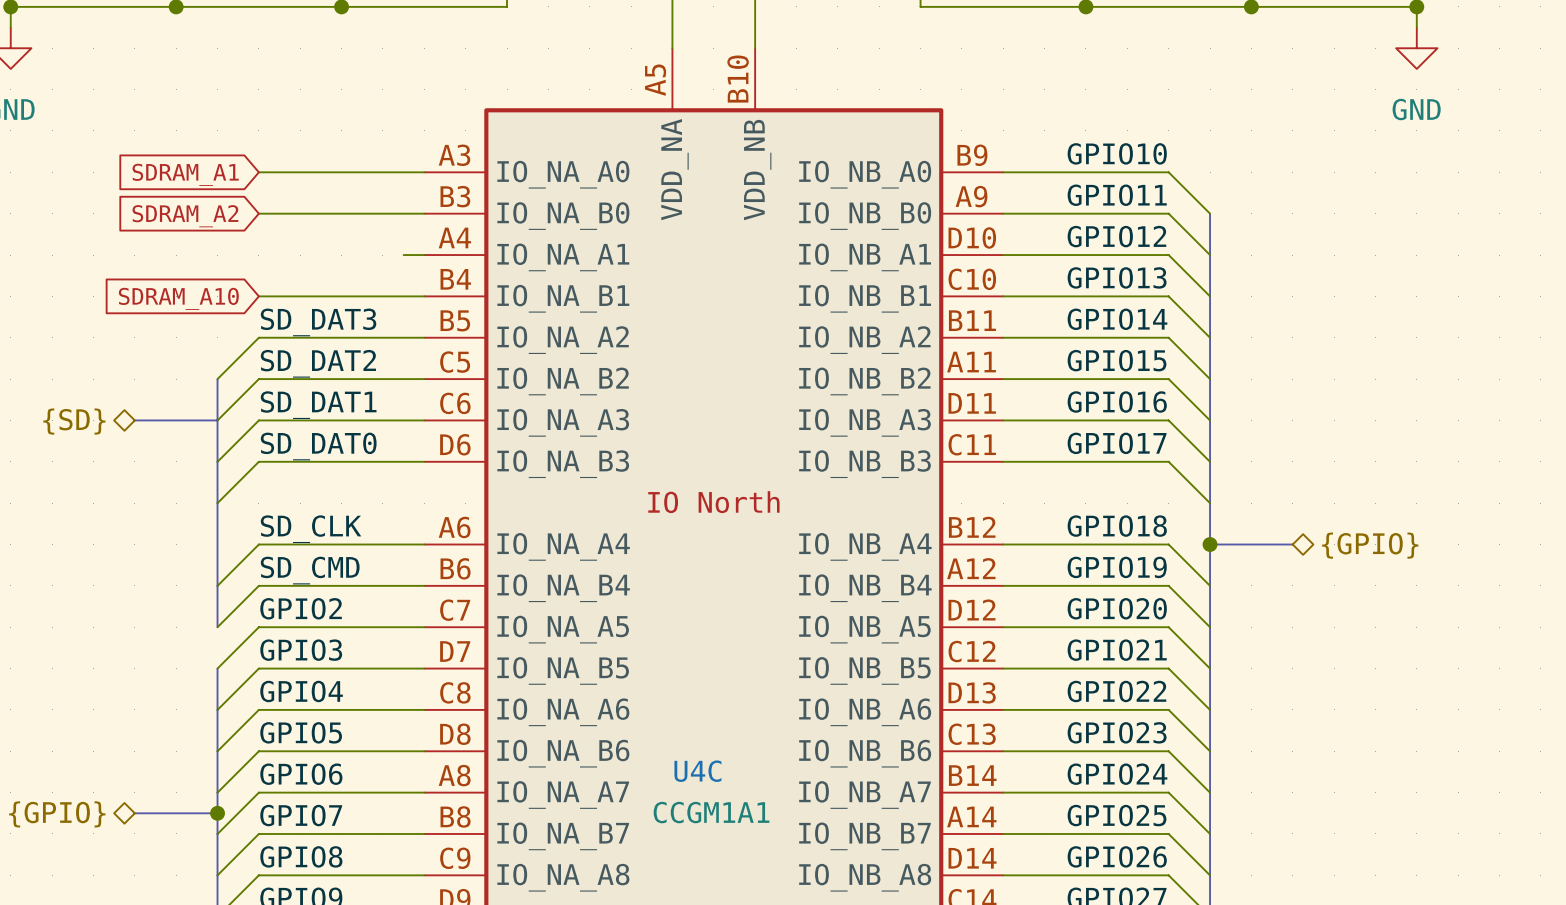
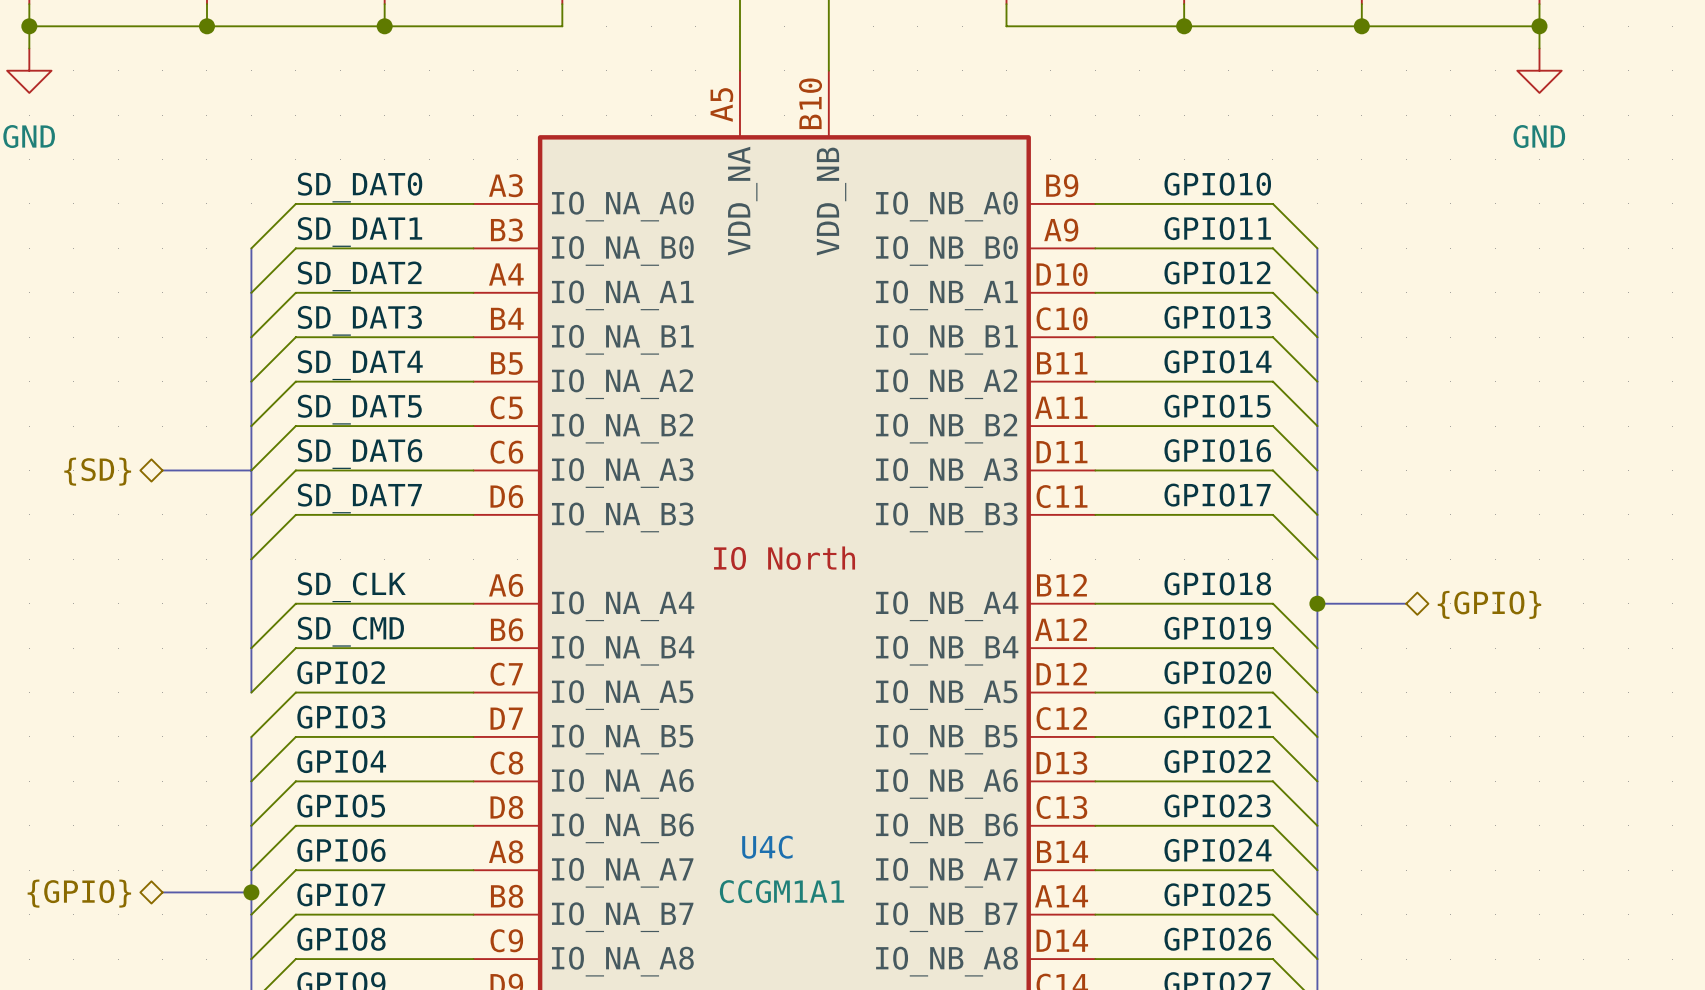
label: none -> SD_DAT0 (360, 187)
wire: none -> (295, 203) (251, 248)
global label: SDRAM_A1 (185, 174) -> none
label: none -> SD_DAT1 (360, 231)
bus: none -> (251, 248) (251, 426)
wire: none -> (295, 248) (251, 292)
global label: SDRAM_A2 (185, 216) -> none
label: none -> SD_DAT2 (359, 276)
wire: none -> (451, 292) (295, 292) (251, 337)
label: none -> SD_DAT3 (359, 320)
wire: none -> (295, 337) (251, 381)
global label: SDRAM_A10 (178, 298) -> none
label: SD_DAT3 (318, 322) -> SD_DAT4 (360, 365)
label: SD_DAT2 (318, 363) -> SD_DAT5 (359, 409)
label: SD_DAT1 (318, 405) -> SD_DAT6 (360, 454)
label: SD_DAT0 (318, 446) -> SD_DAT7 (359, 498)

